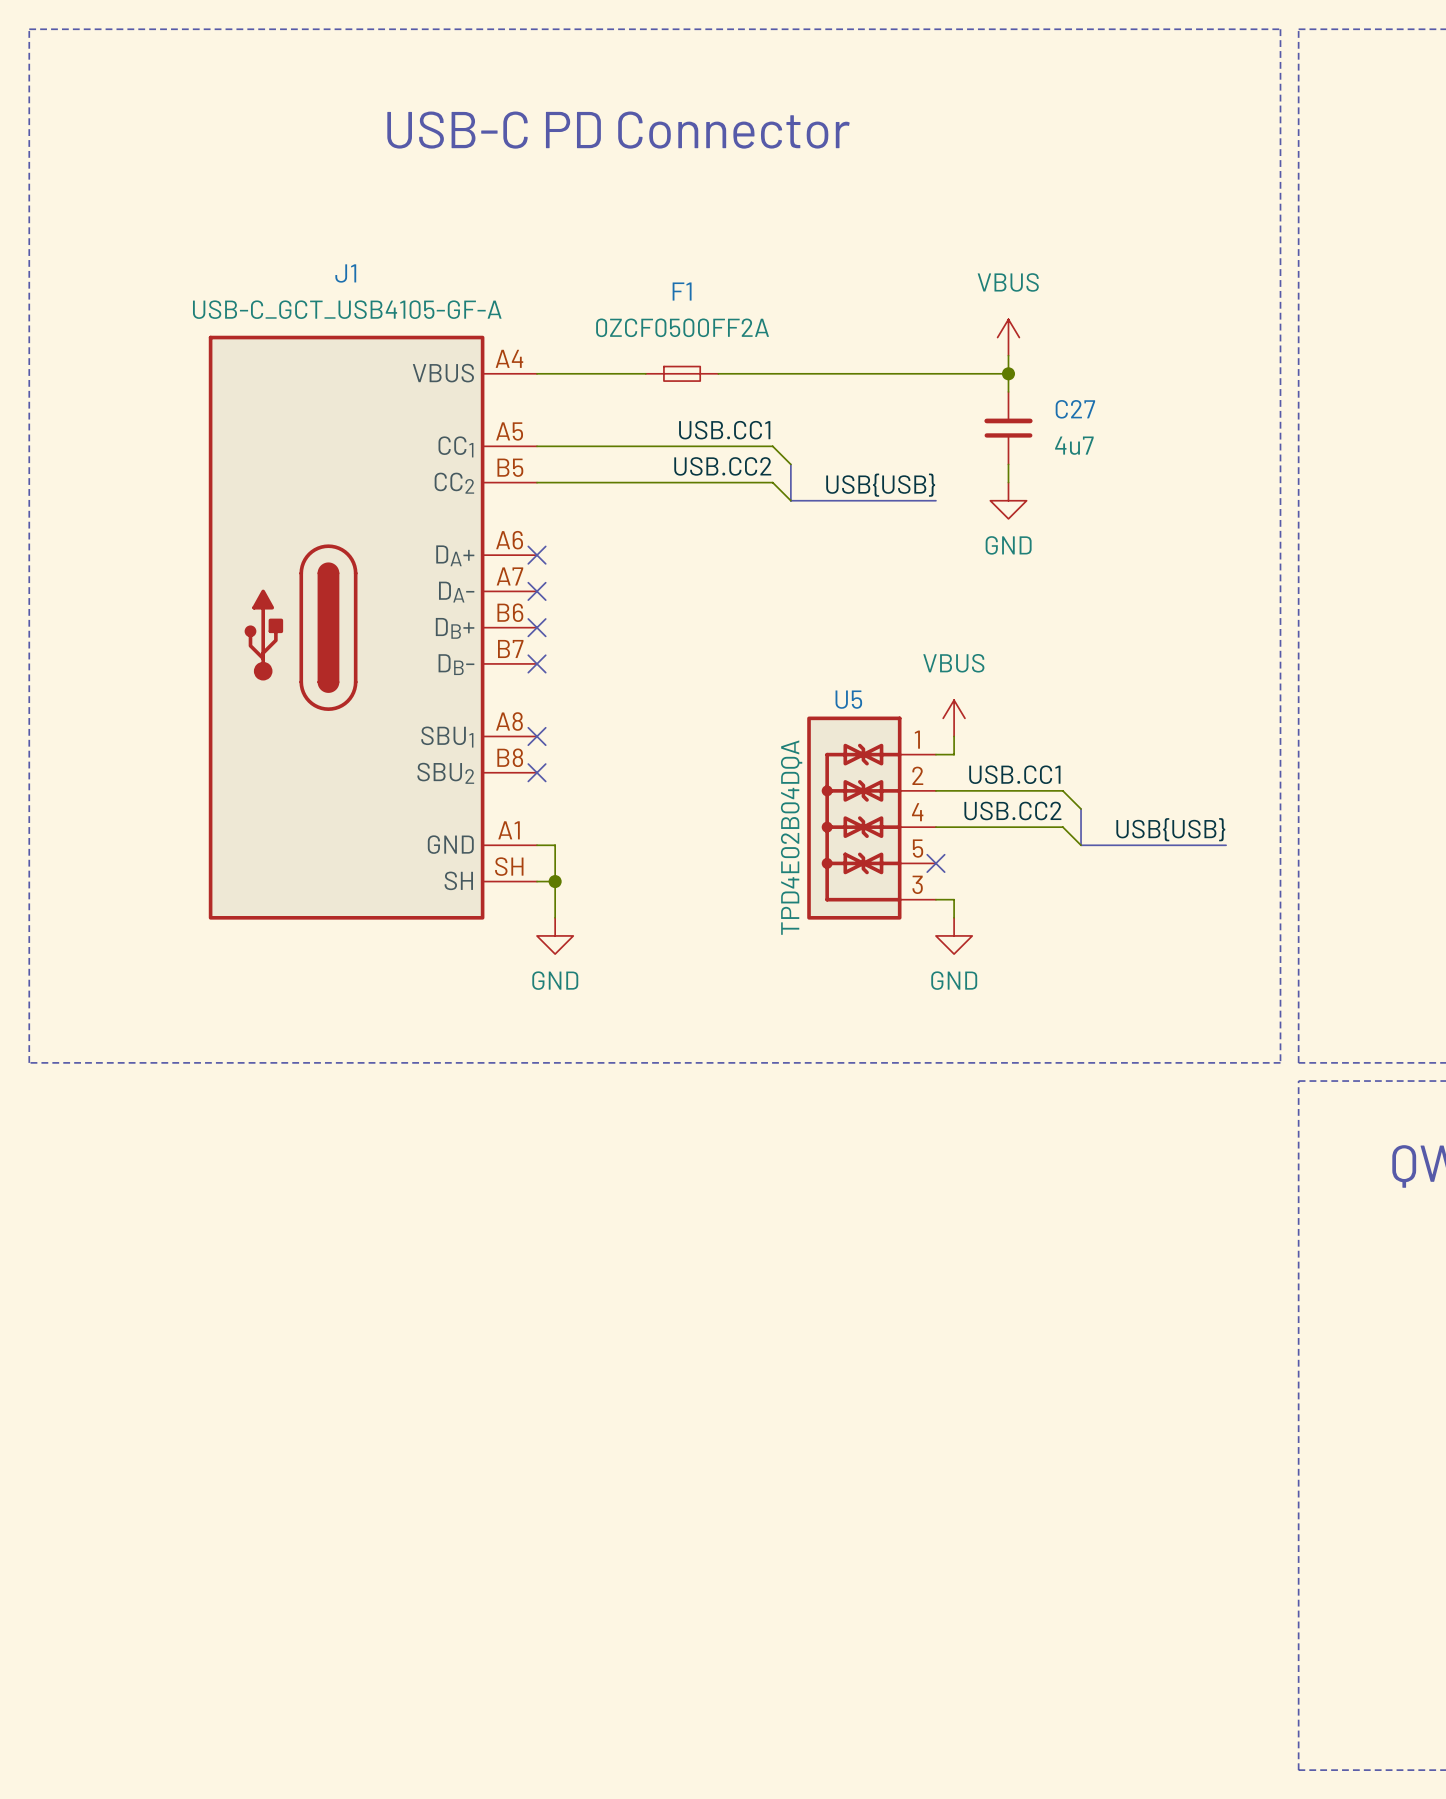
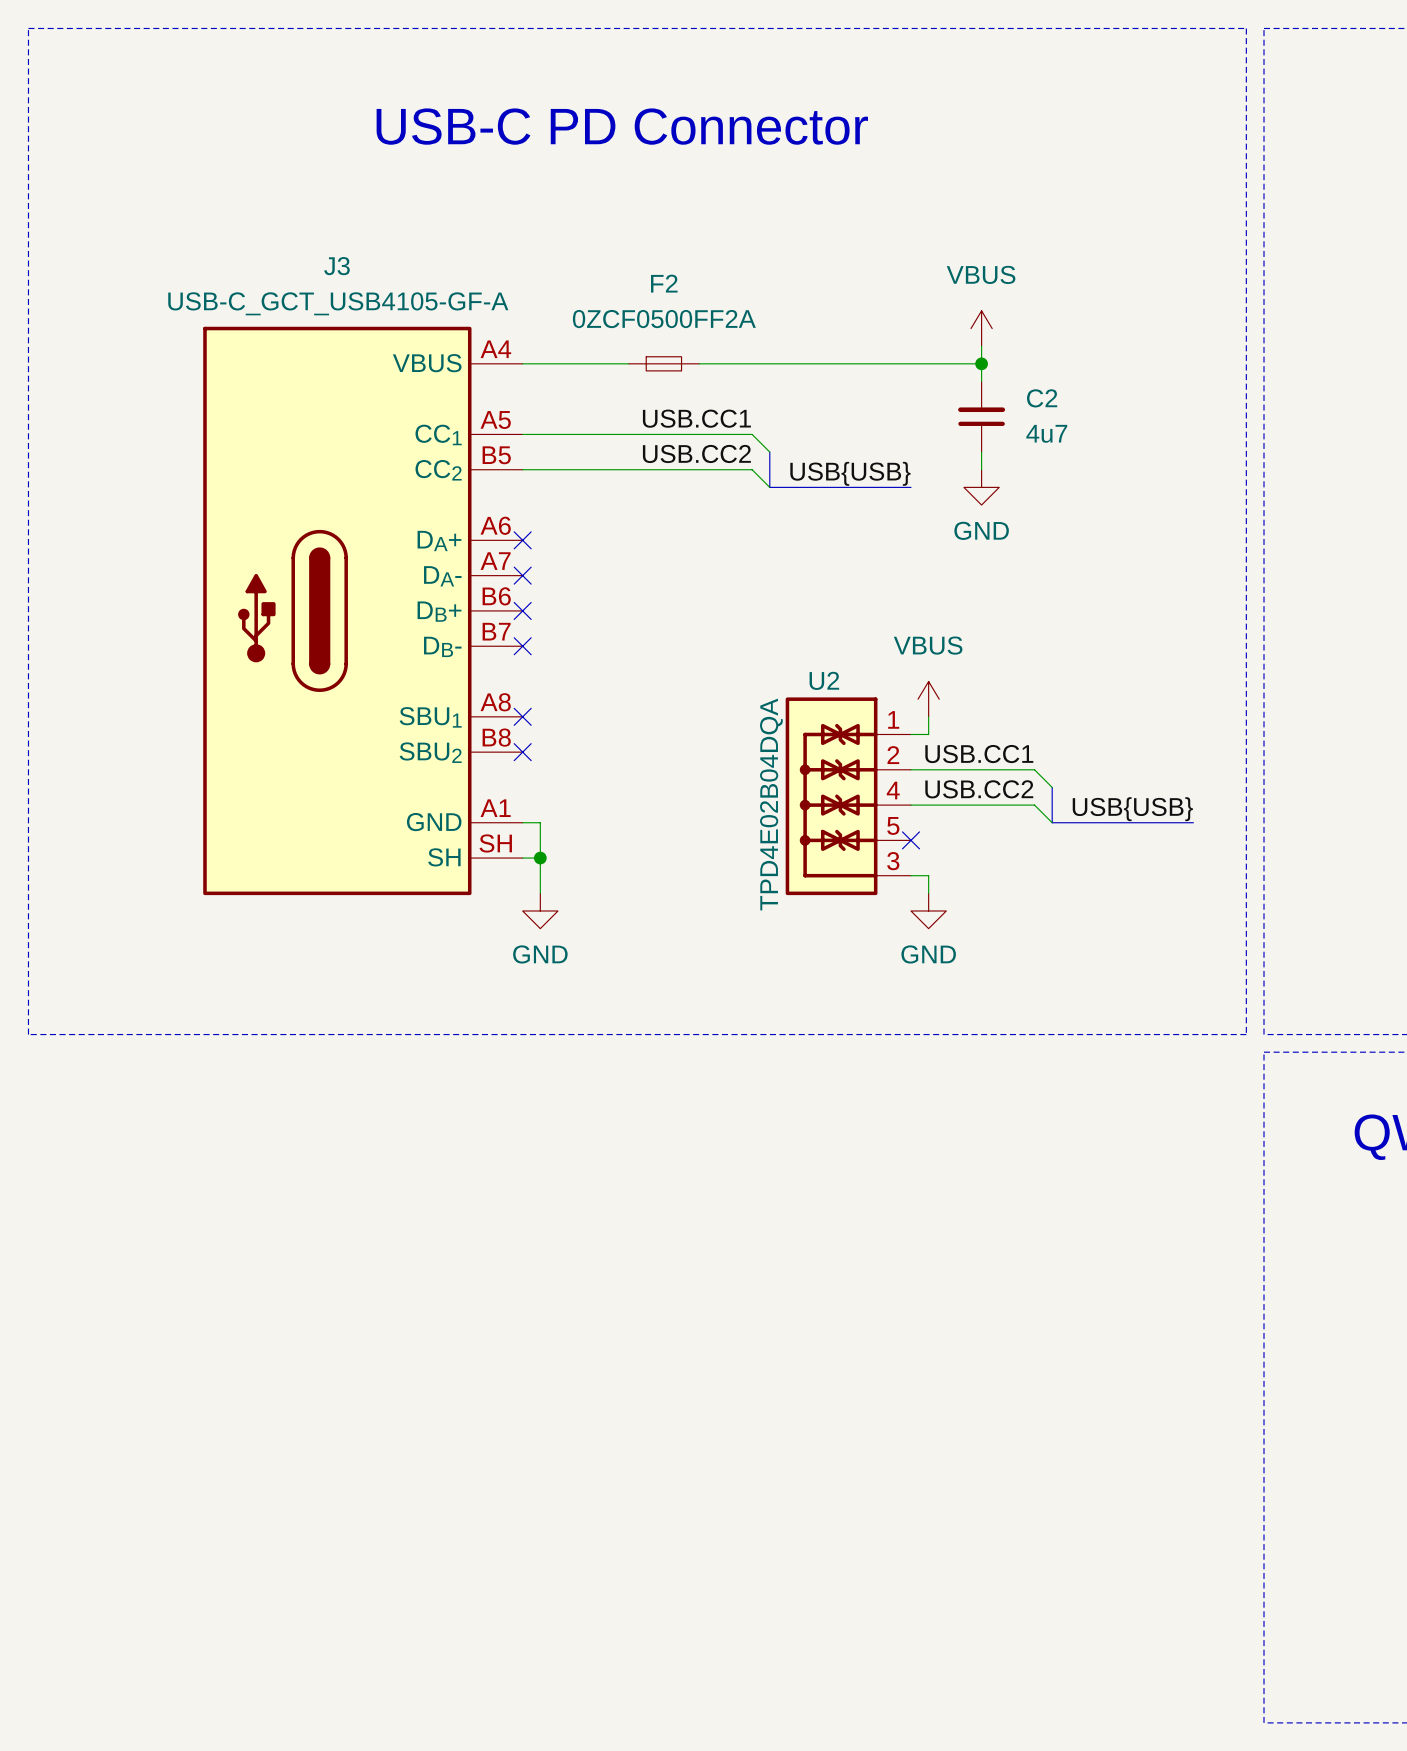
J1 name: J1 (345, 273) -> J3 (336, 266)
F1 name: F1 (682, 291) -> F2 (664, 283)
C27 name: C27 (1075, 409) -> C2 (1042, 398)
U5 name: U5 (848, 699) -> U2 (824, 680)

